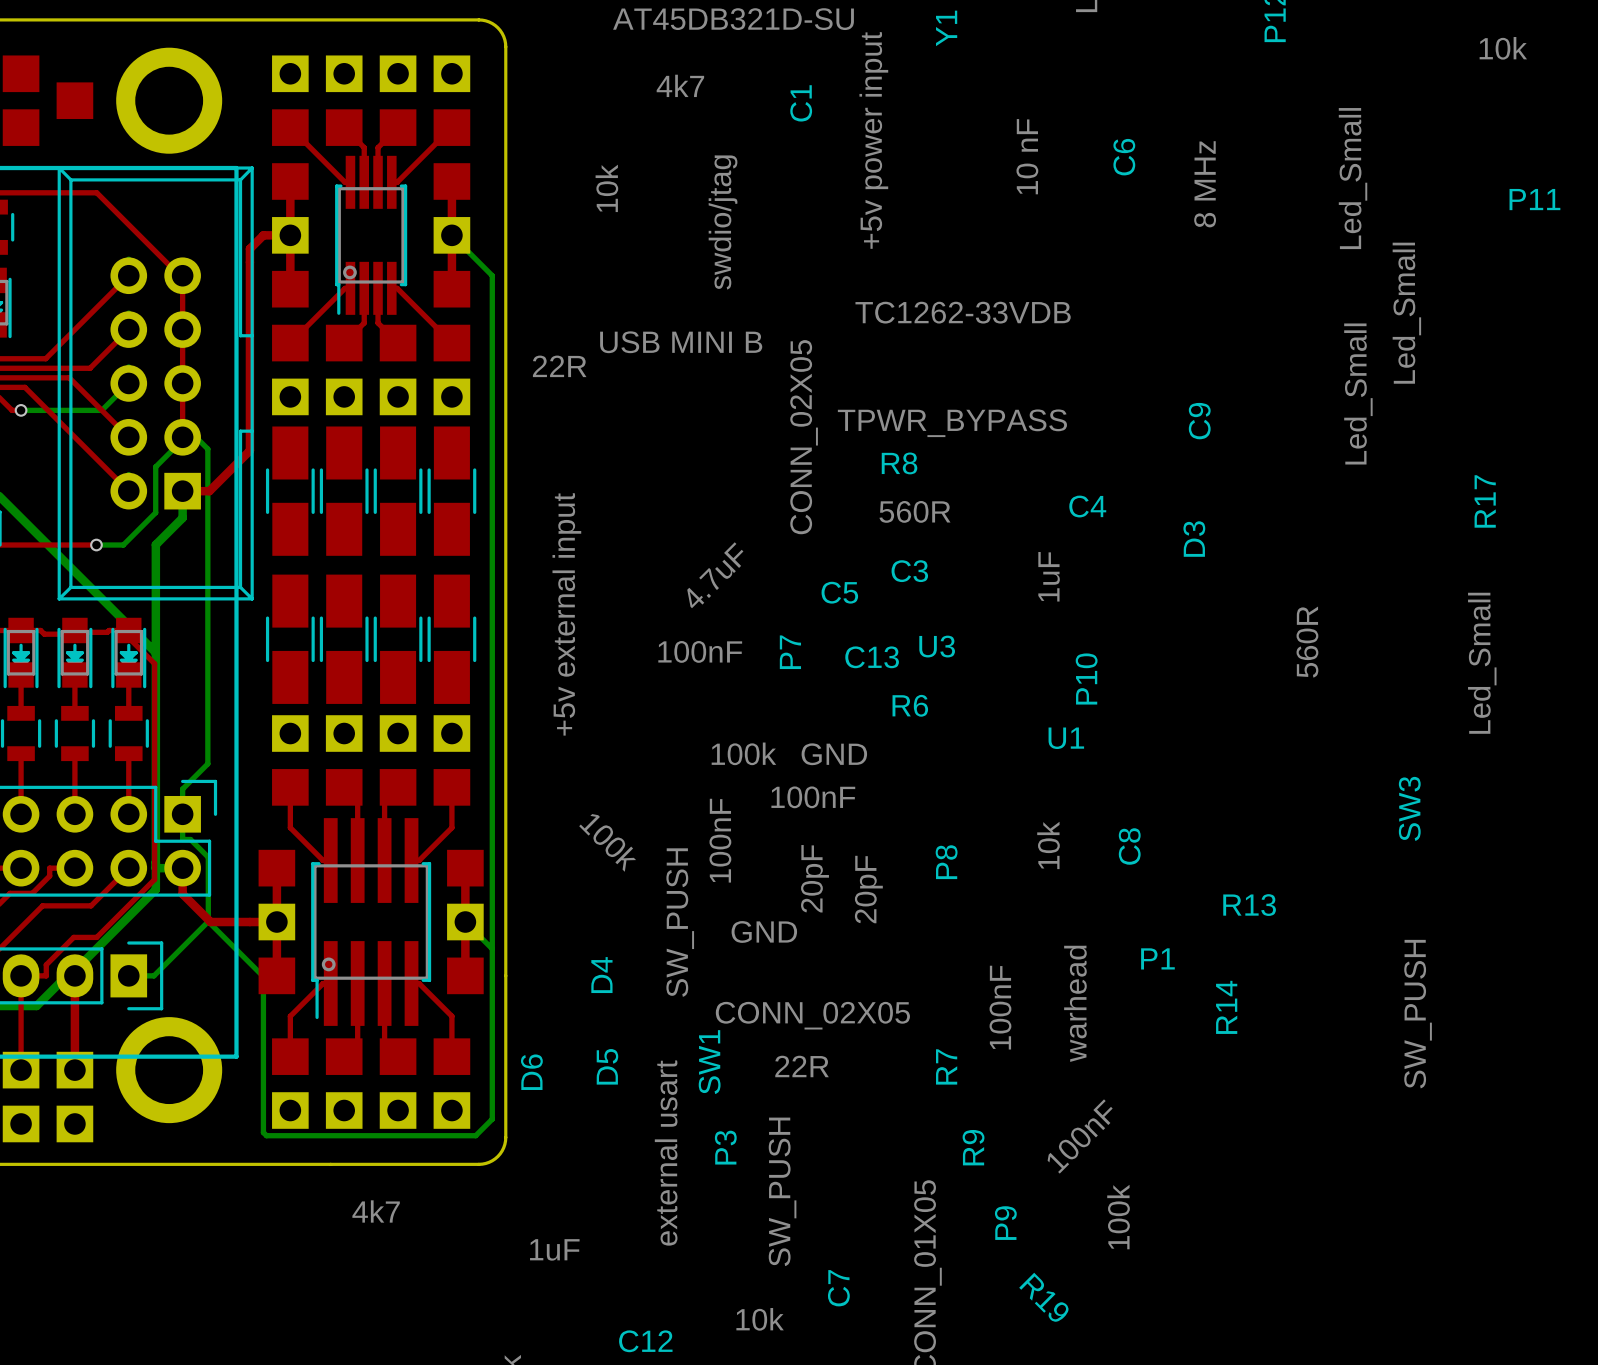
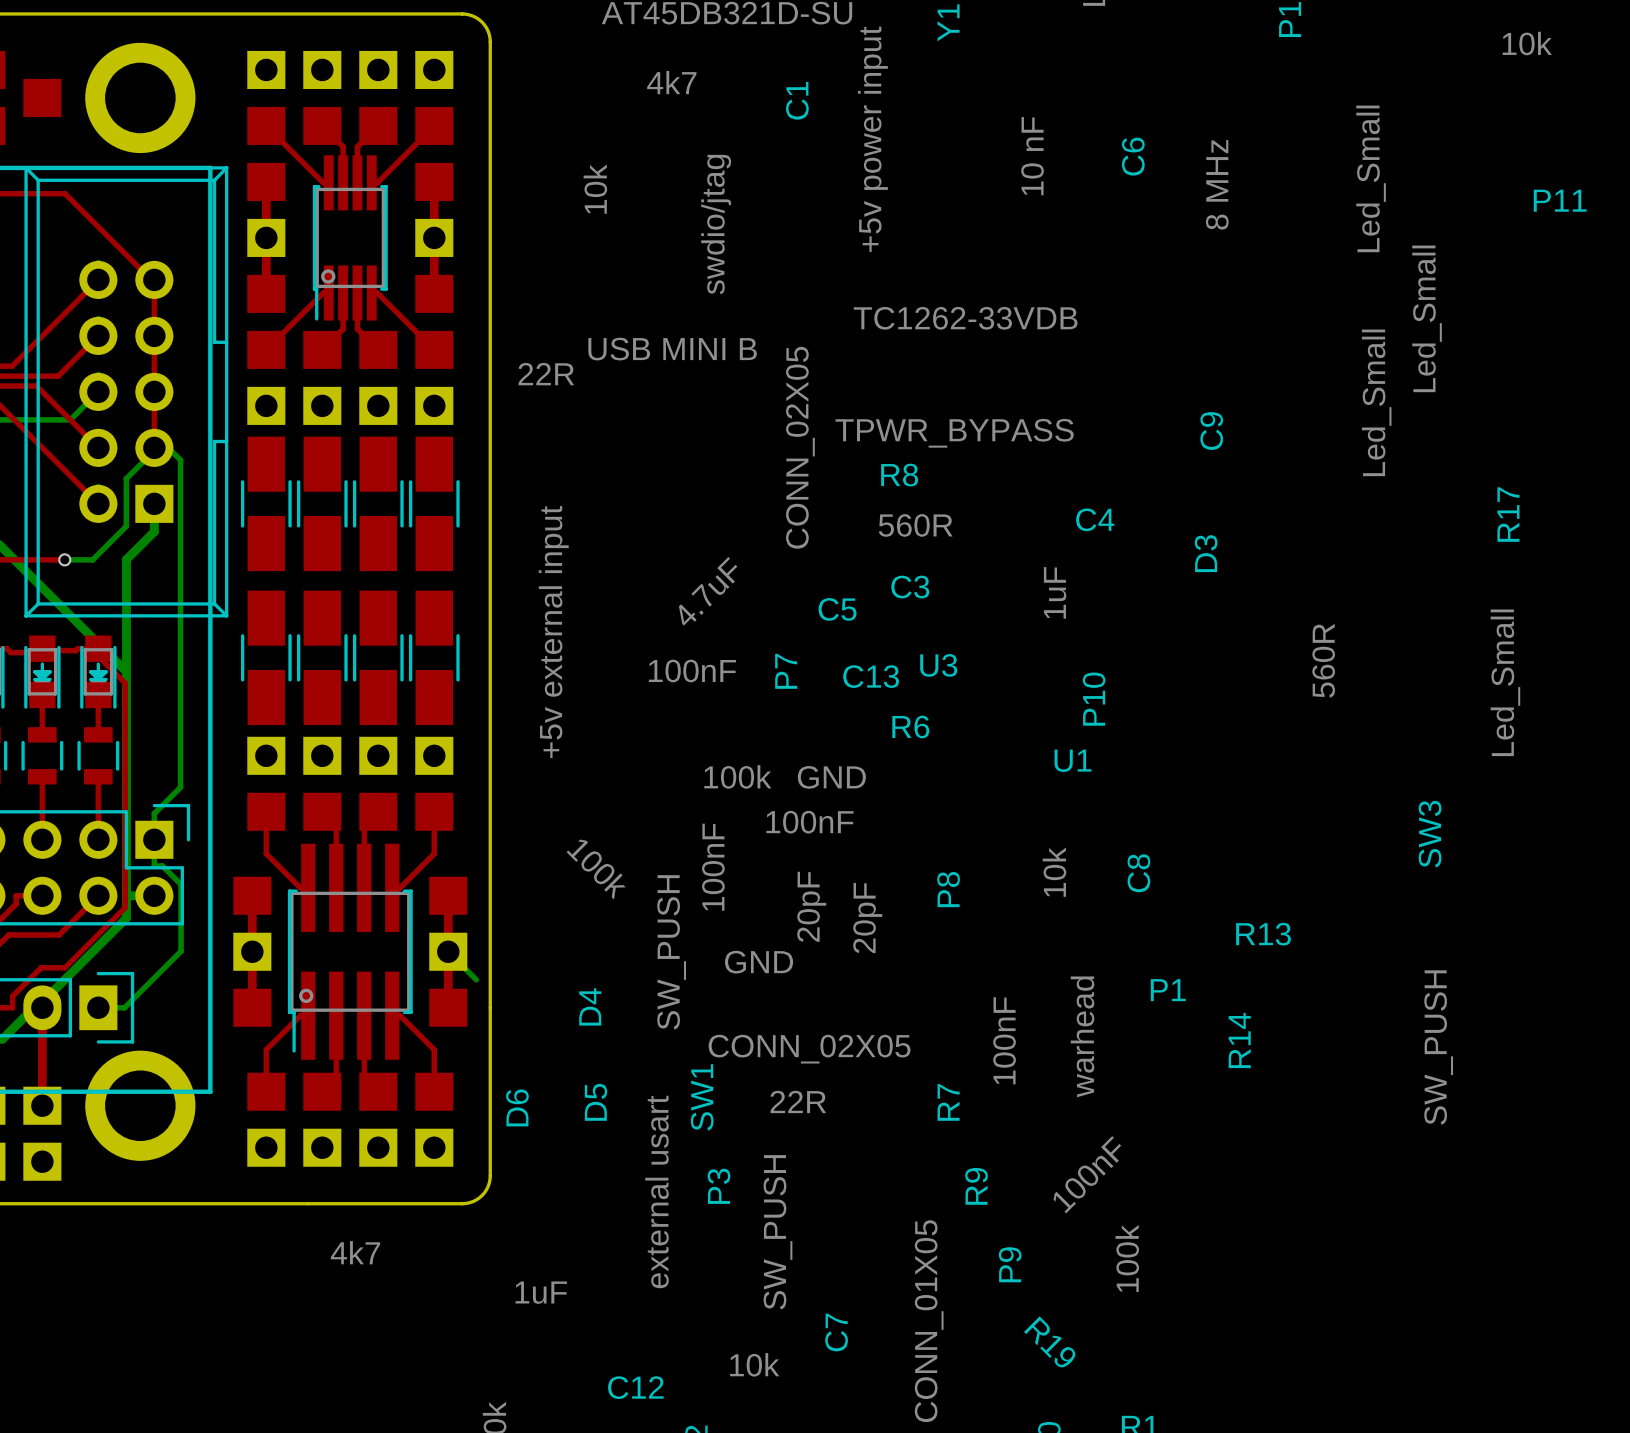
top track: (290, 235) (263, 235) (249, 248) (249, 450) (209, 491) (182, 491) -> none
bottom track: (451, 235) (492, 275) (492, 1119) (475, 1135) (266, 1135) (263, 1132) (263, 976) (208, 921) -> none
top track: (182, 868) (182, 894) (210, 922) (276, 922) -> none

